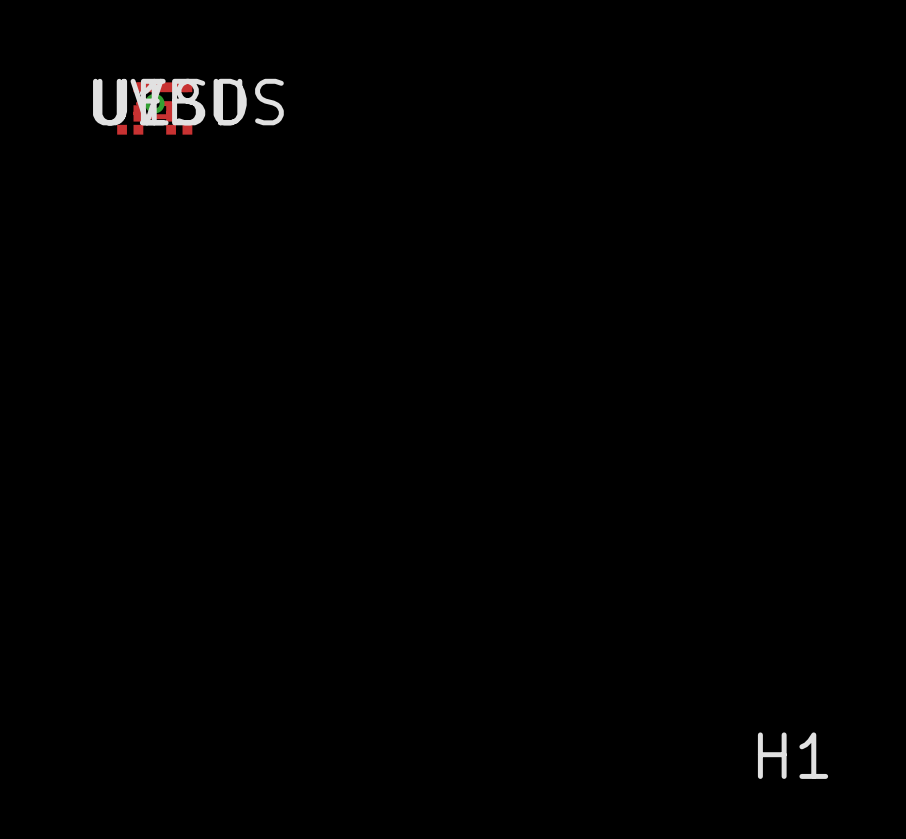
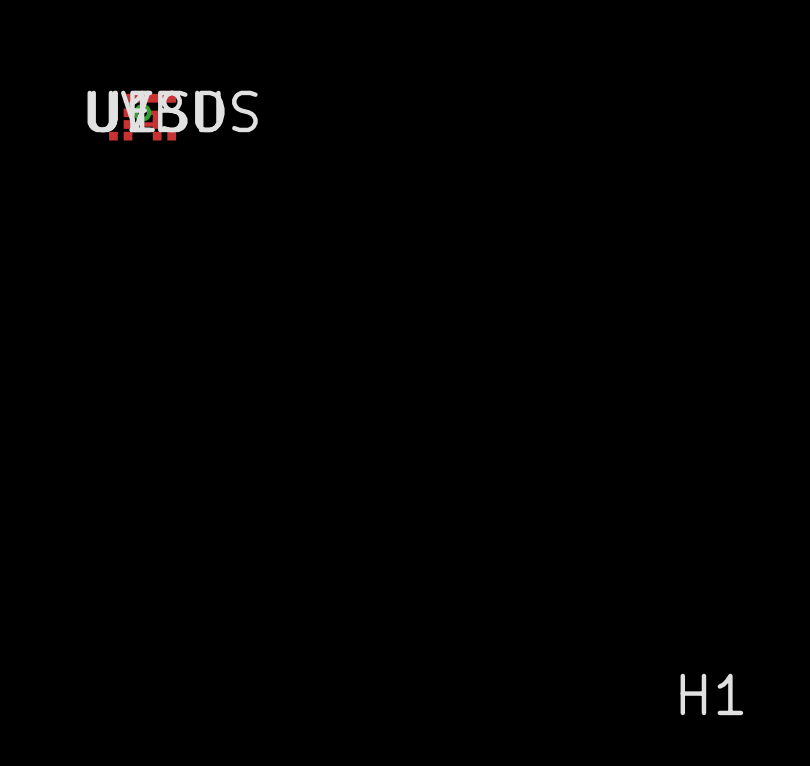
part footprint: [117, 82, 144, 135] -> [109, 93, 133, 141]

